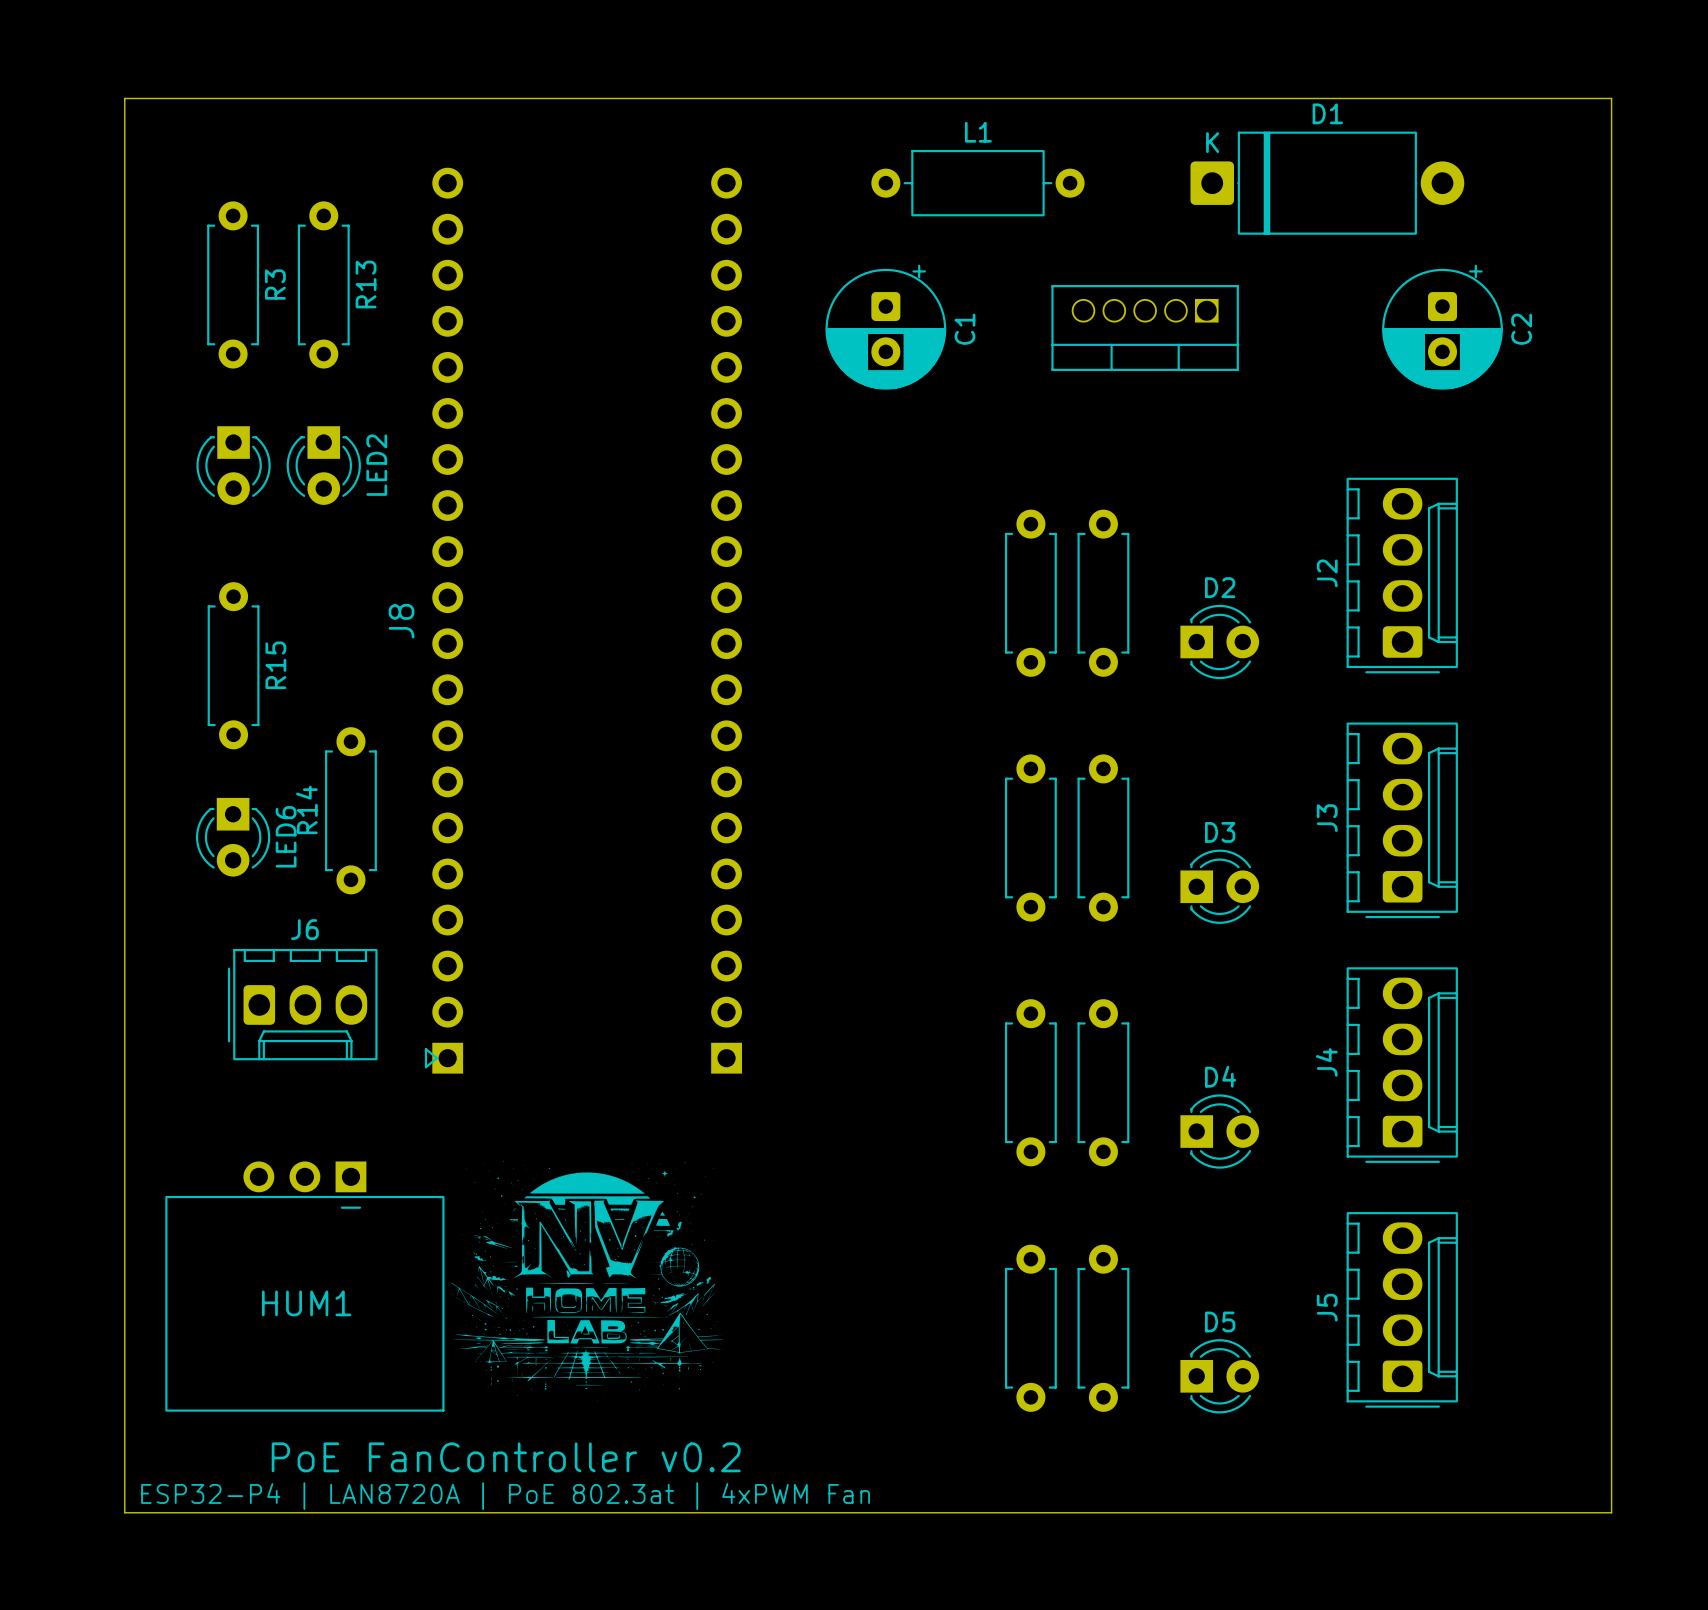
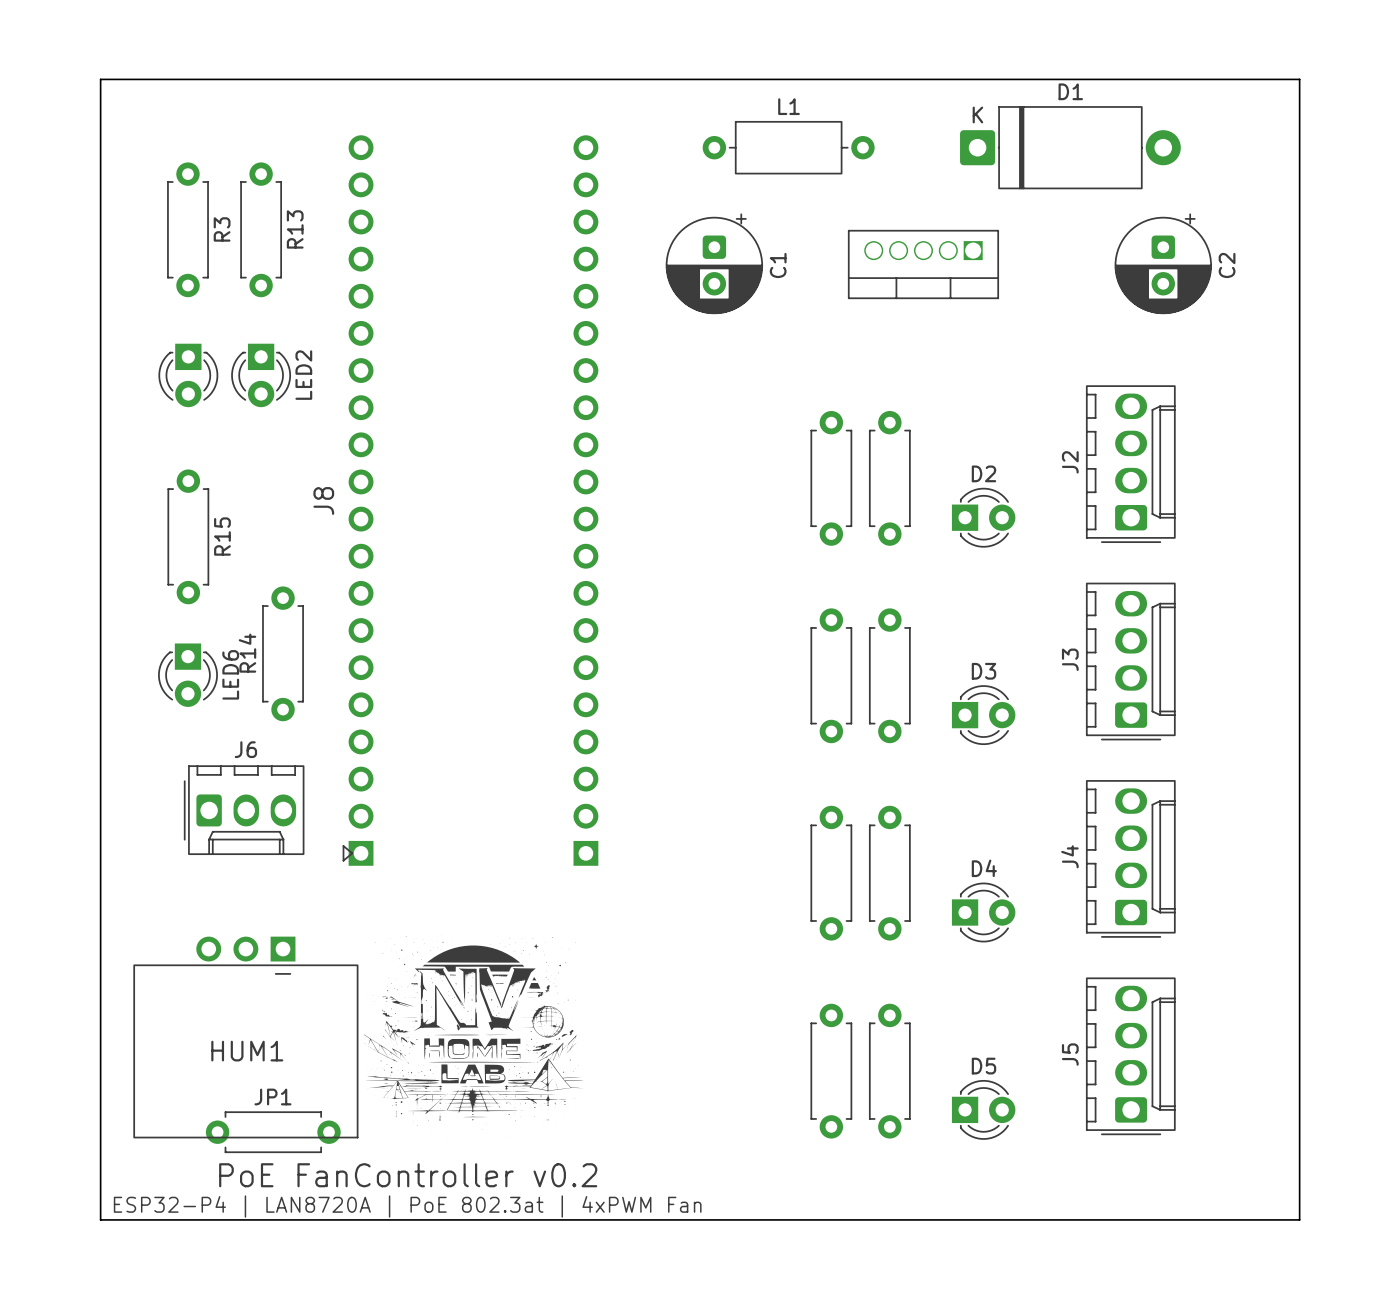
JP1: none -> (273, 1132)

